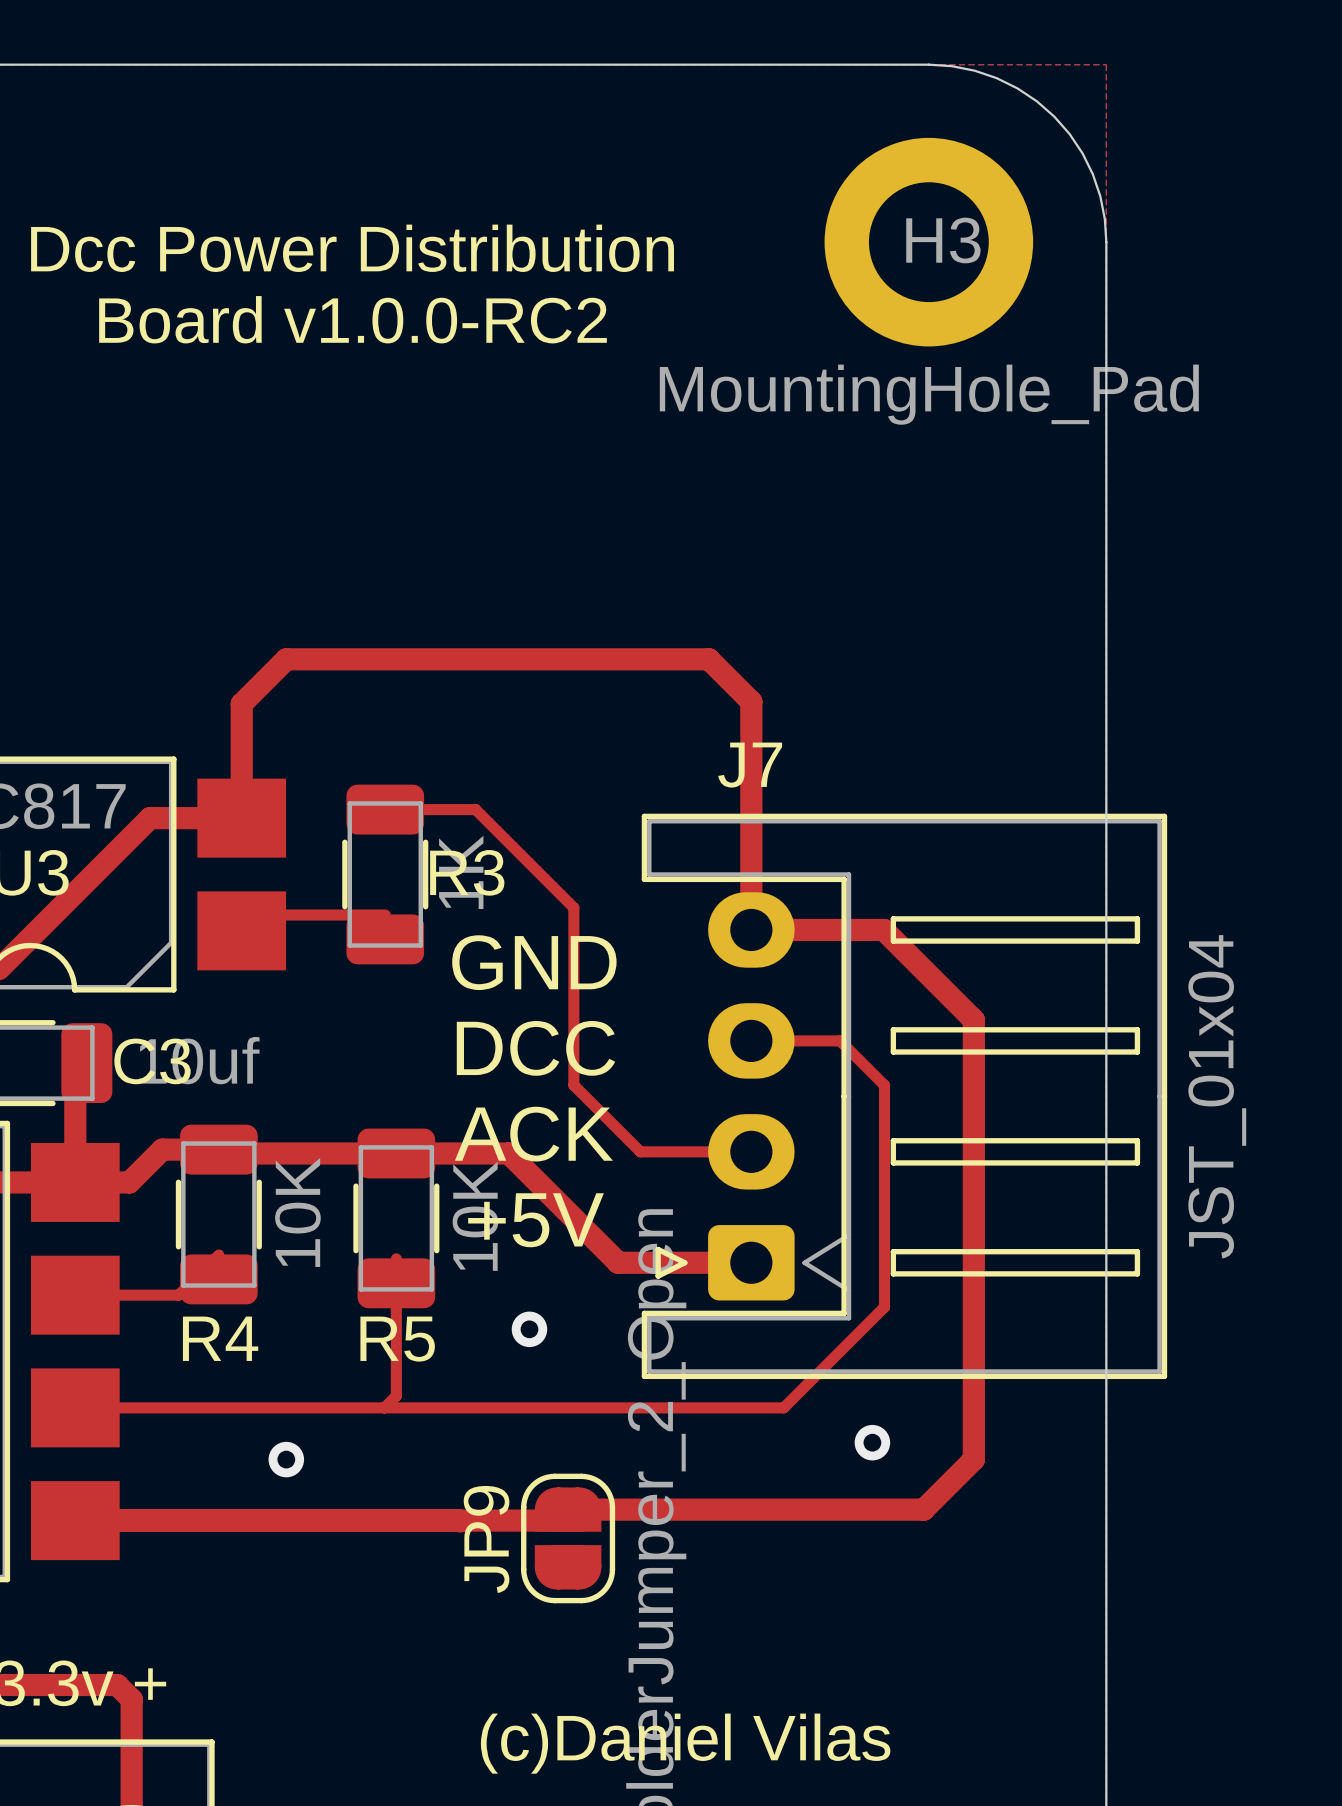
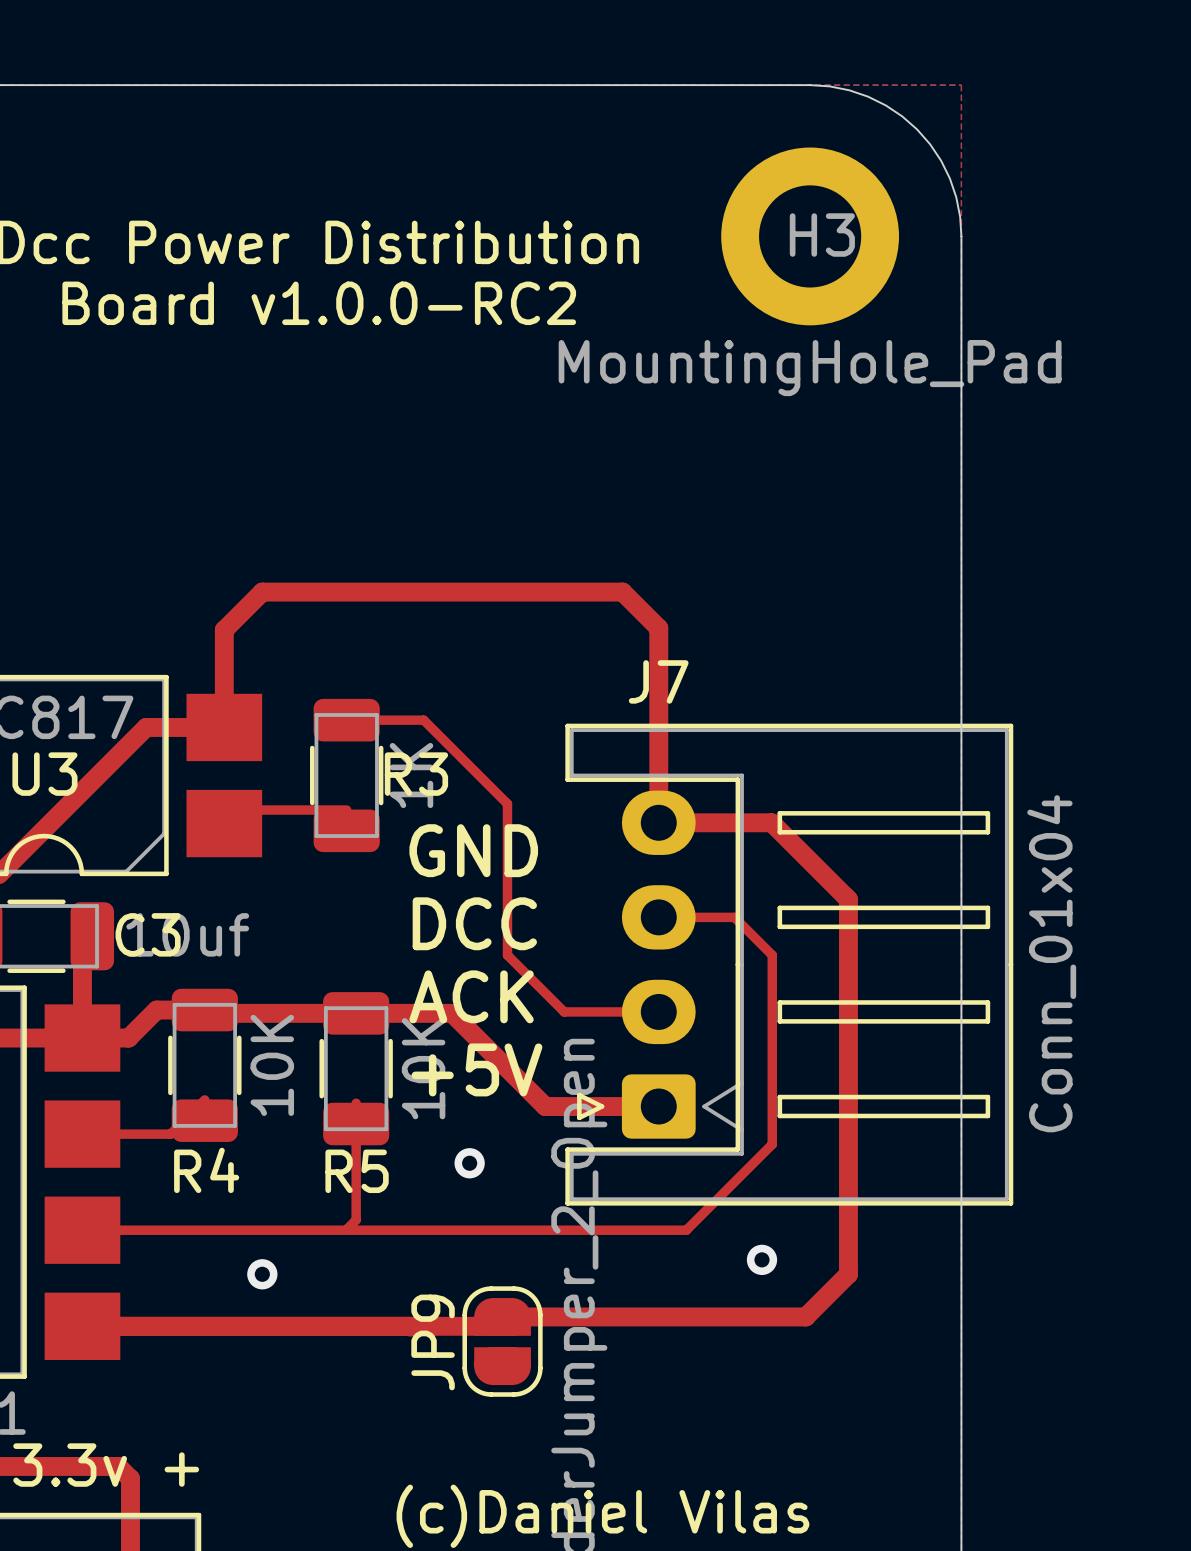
J7 value: JST_01x04 (1217, 1096) -> Conn_01x04 (1051, 963)

